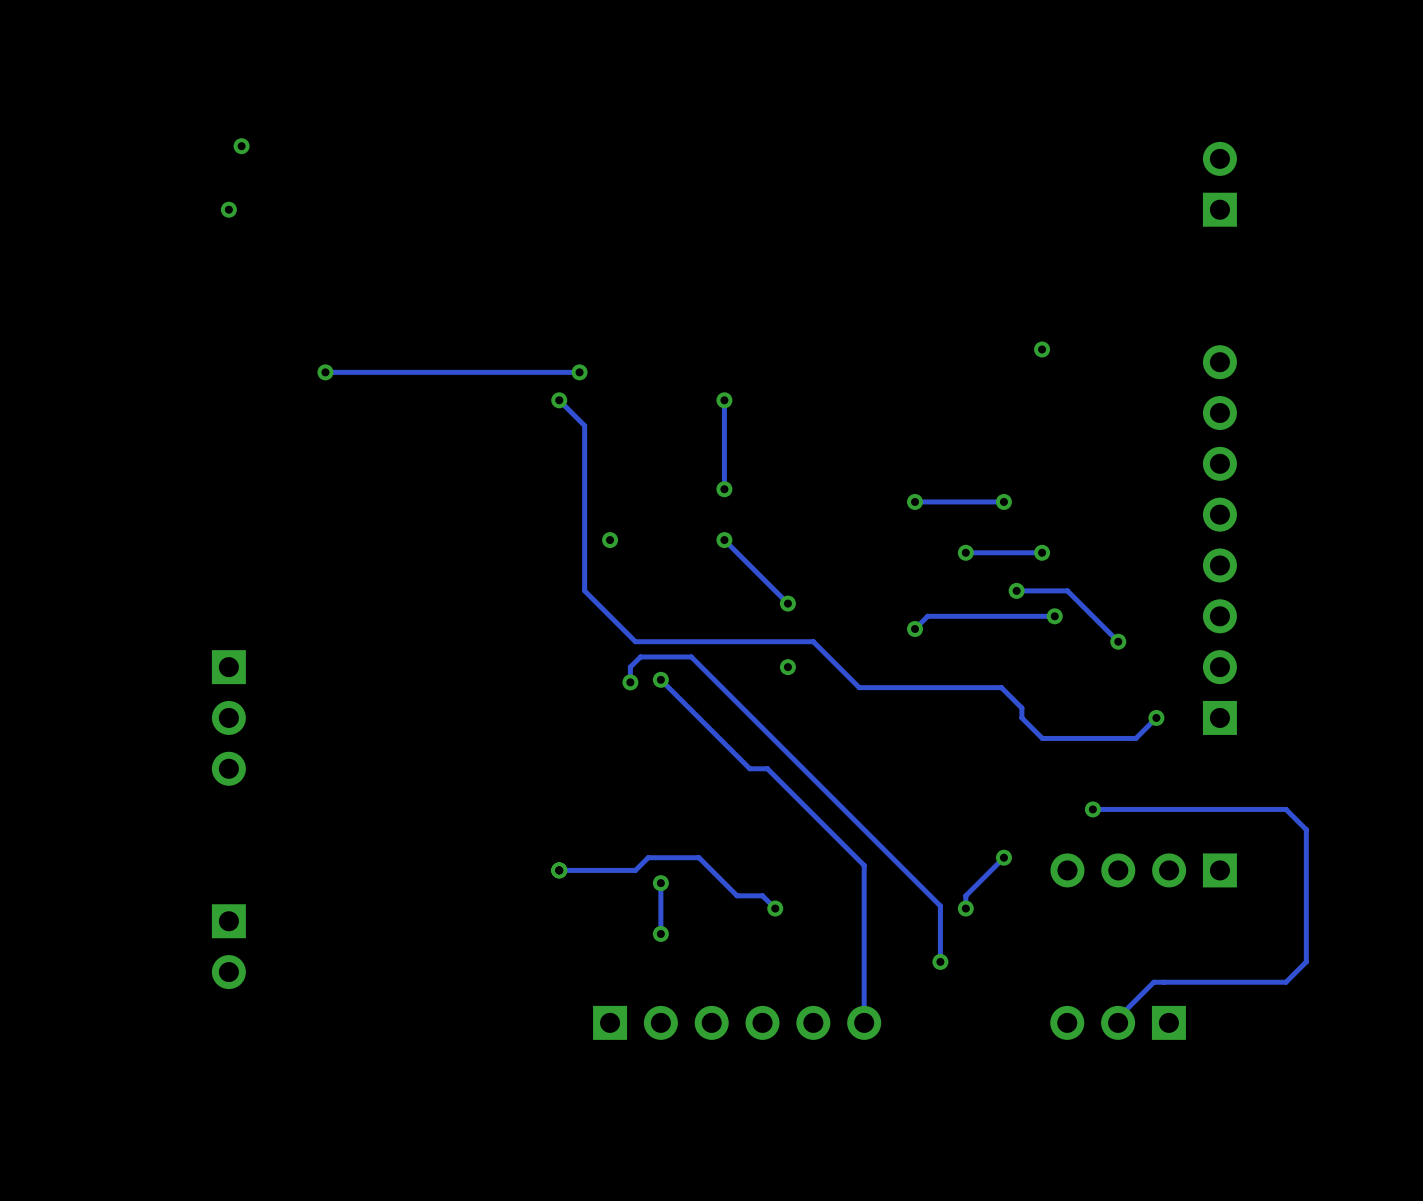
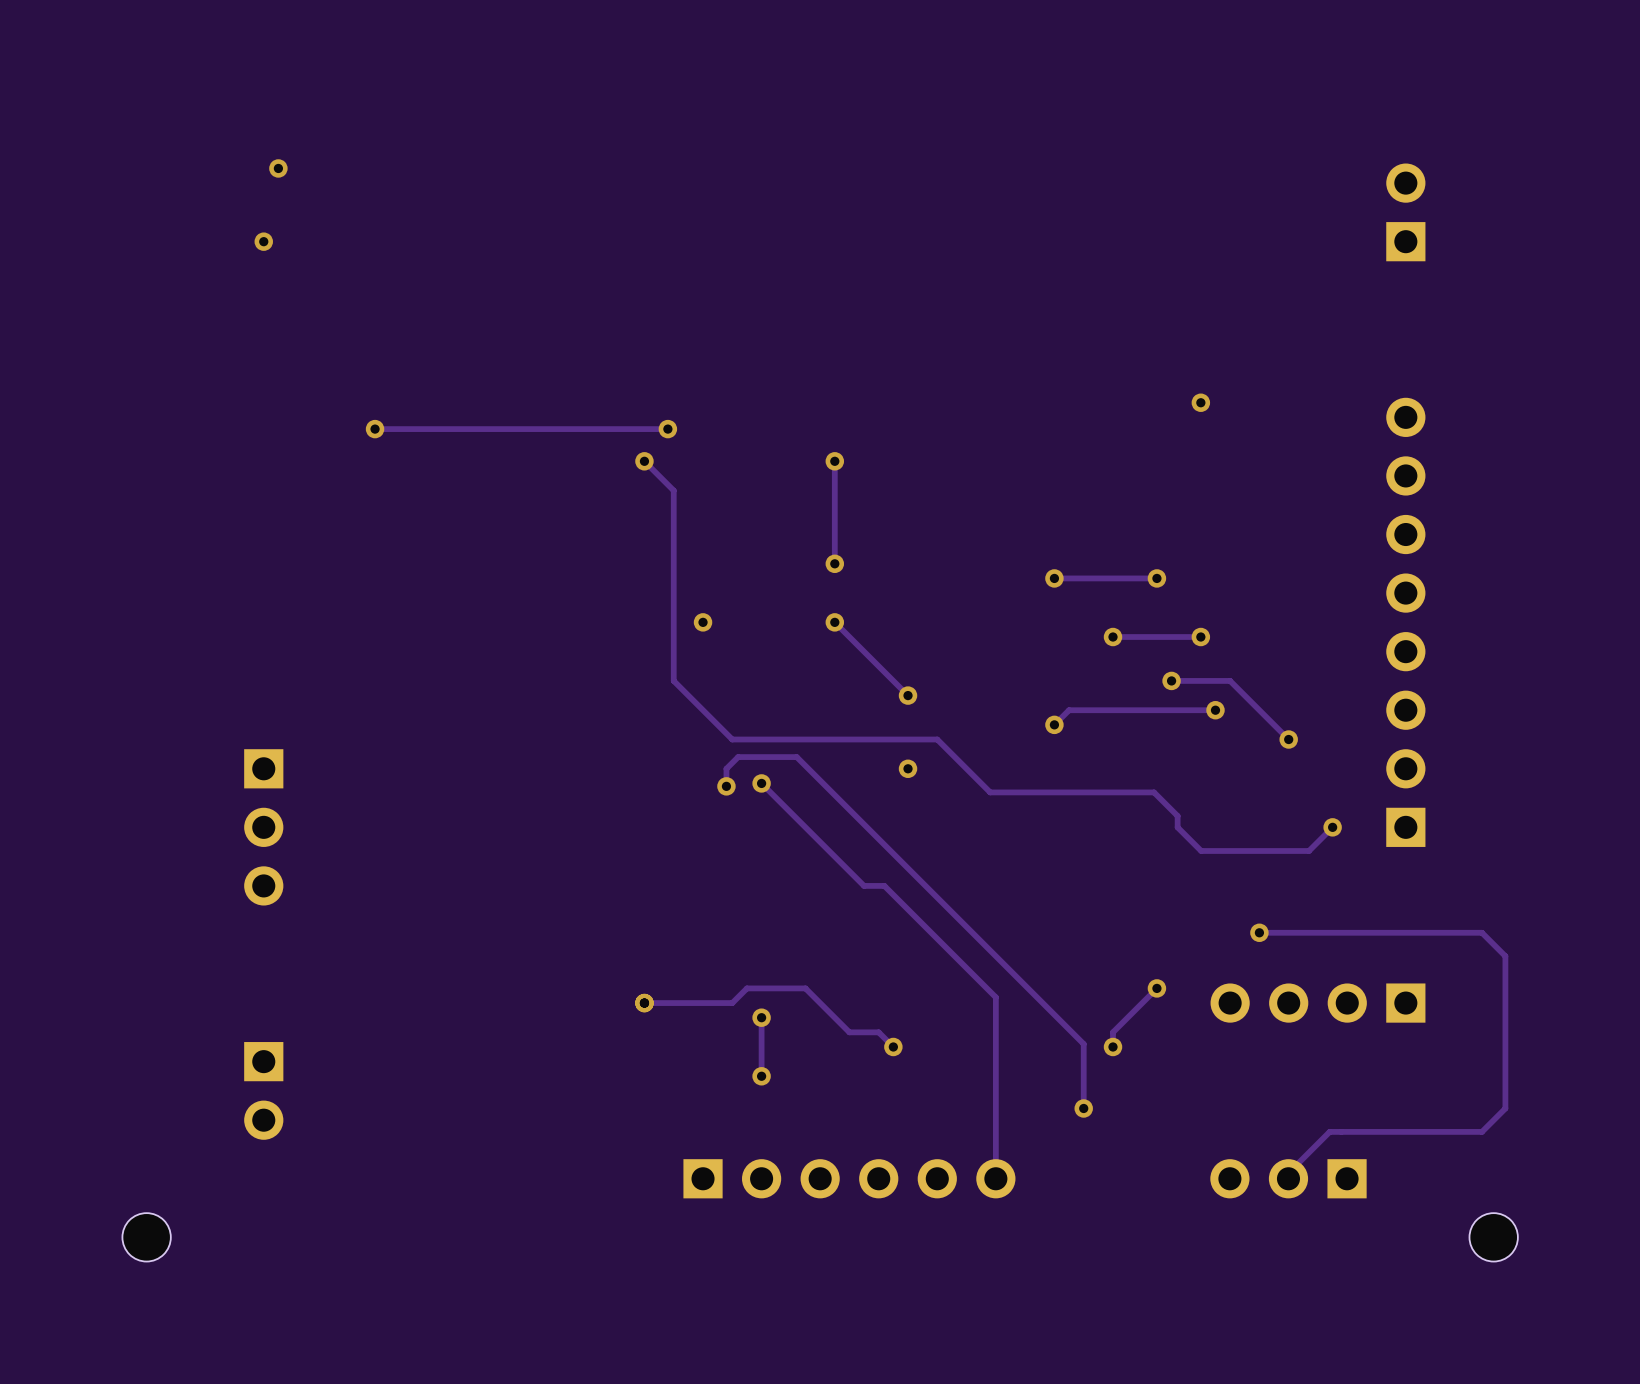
part: none -> (146, 1237)
part: none -> (1493, 1237)

